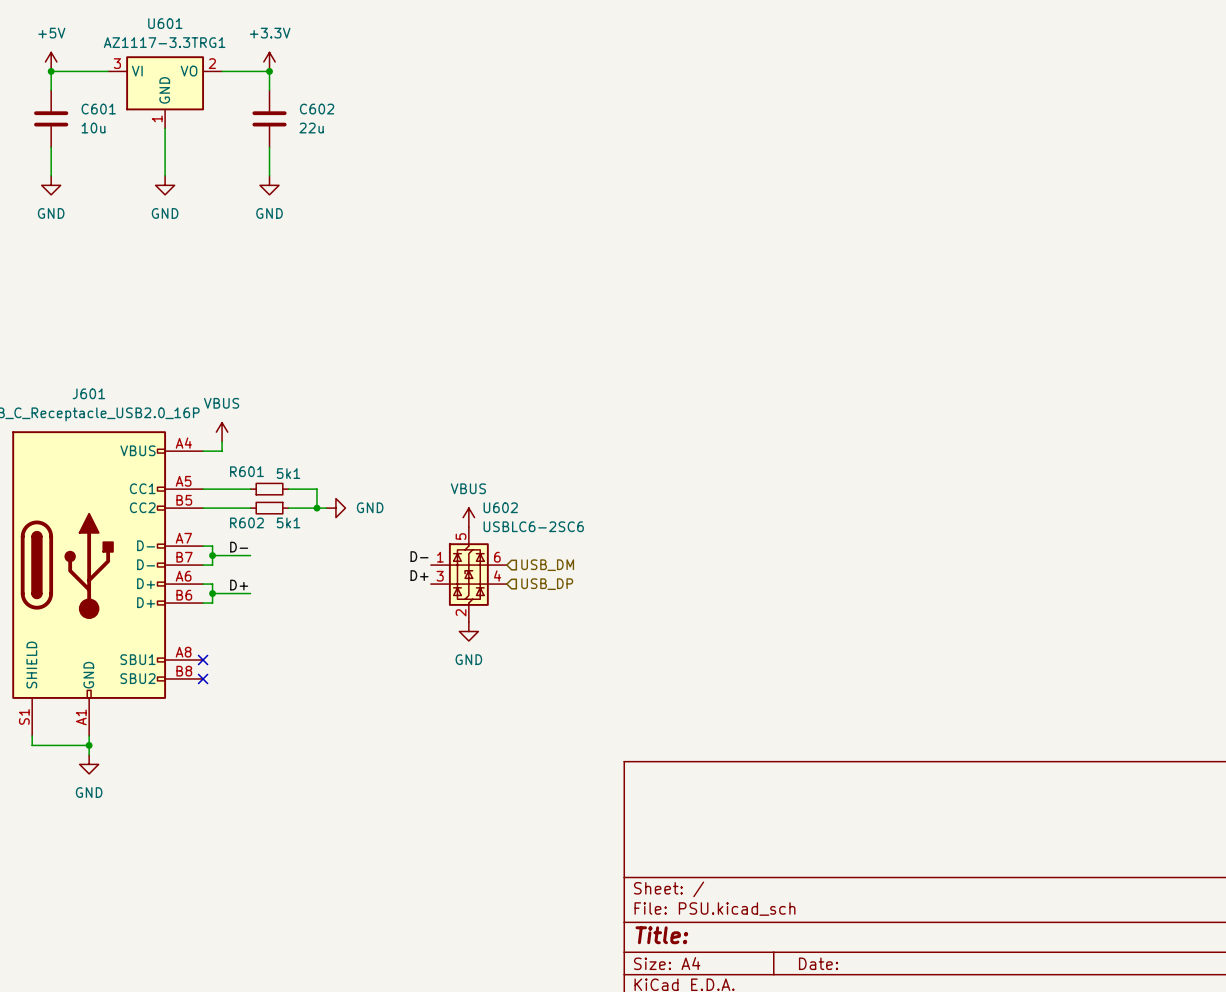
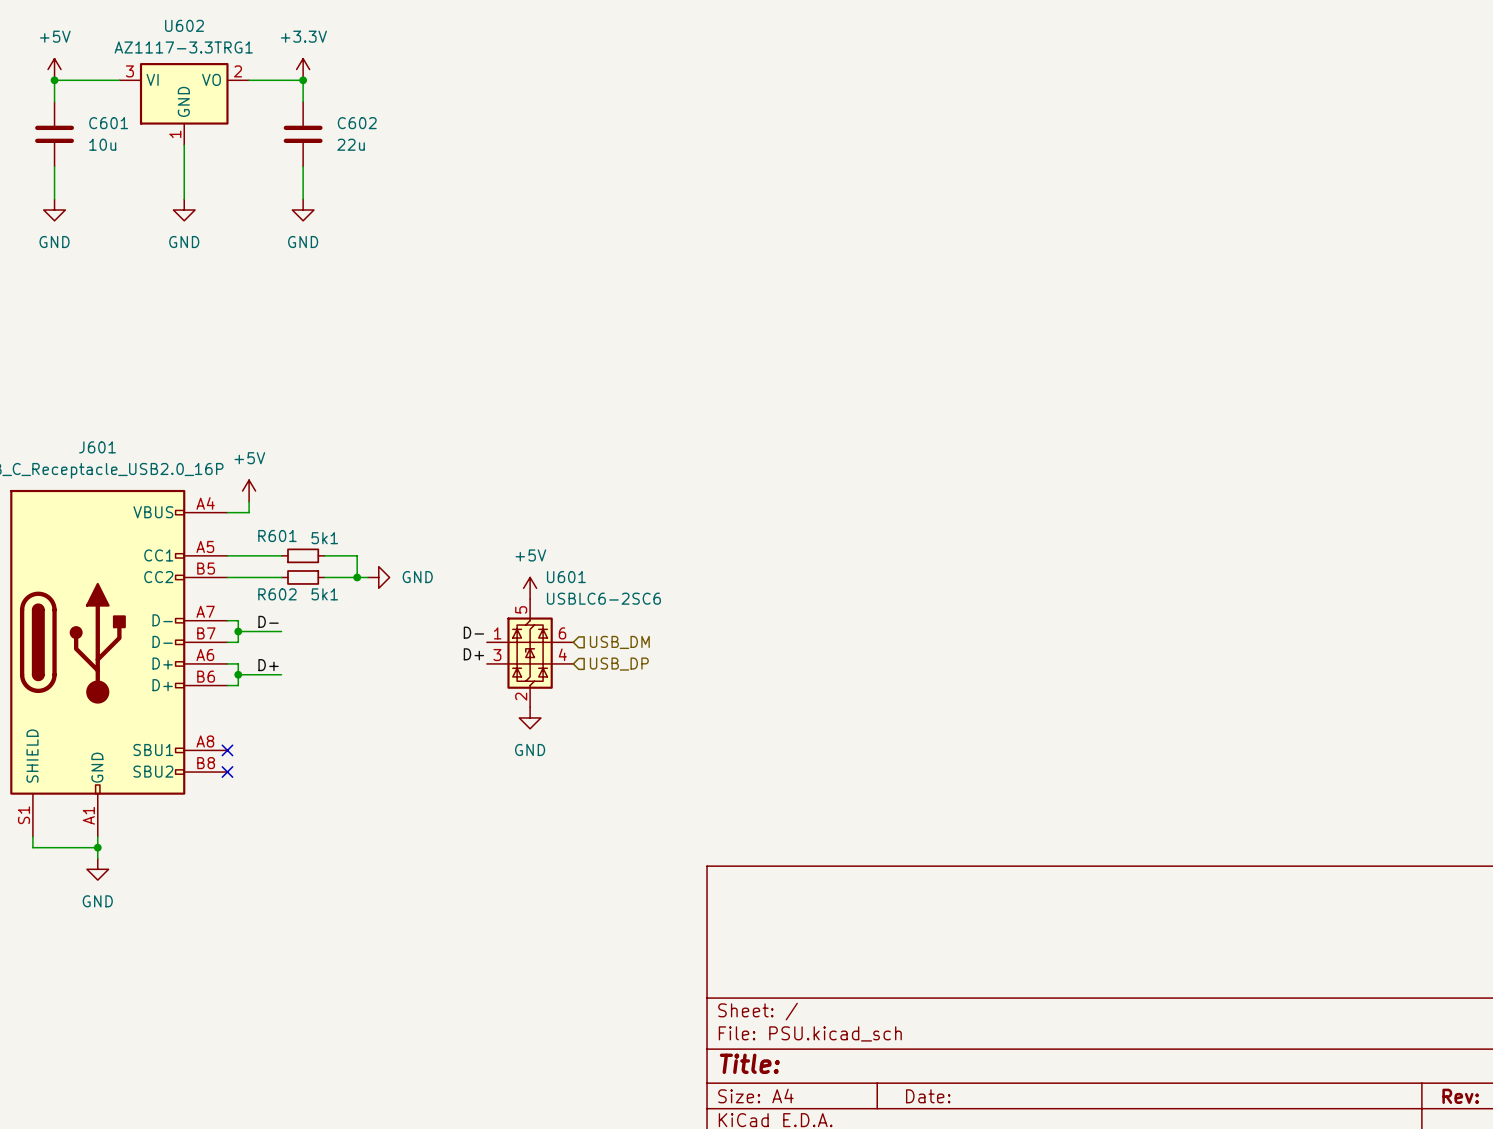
U601 name: U601 (165, 23) -> U602 (184, 25)
power symbol: VBUS (222, 432) -> +5V (249, 491)
U602 name: U602 (500, 507) -> U601 (566, 577)
power symbol: VBUS (468, 517) -> +5V (530, 588)

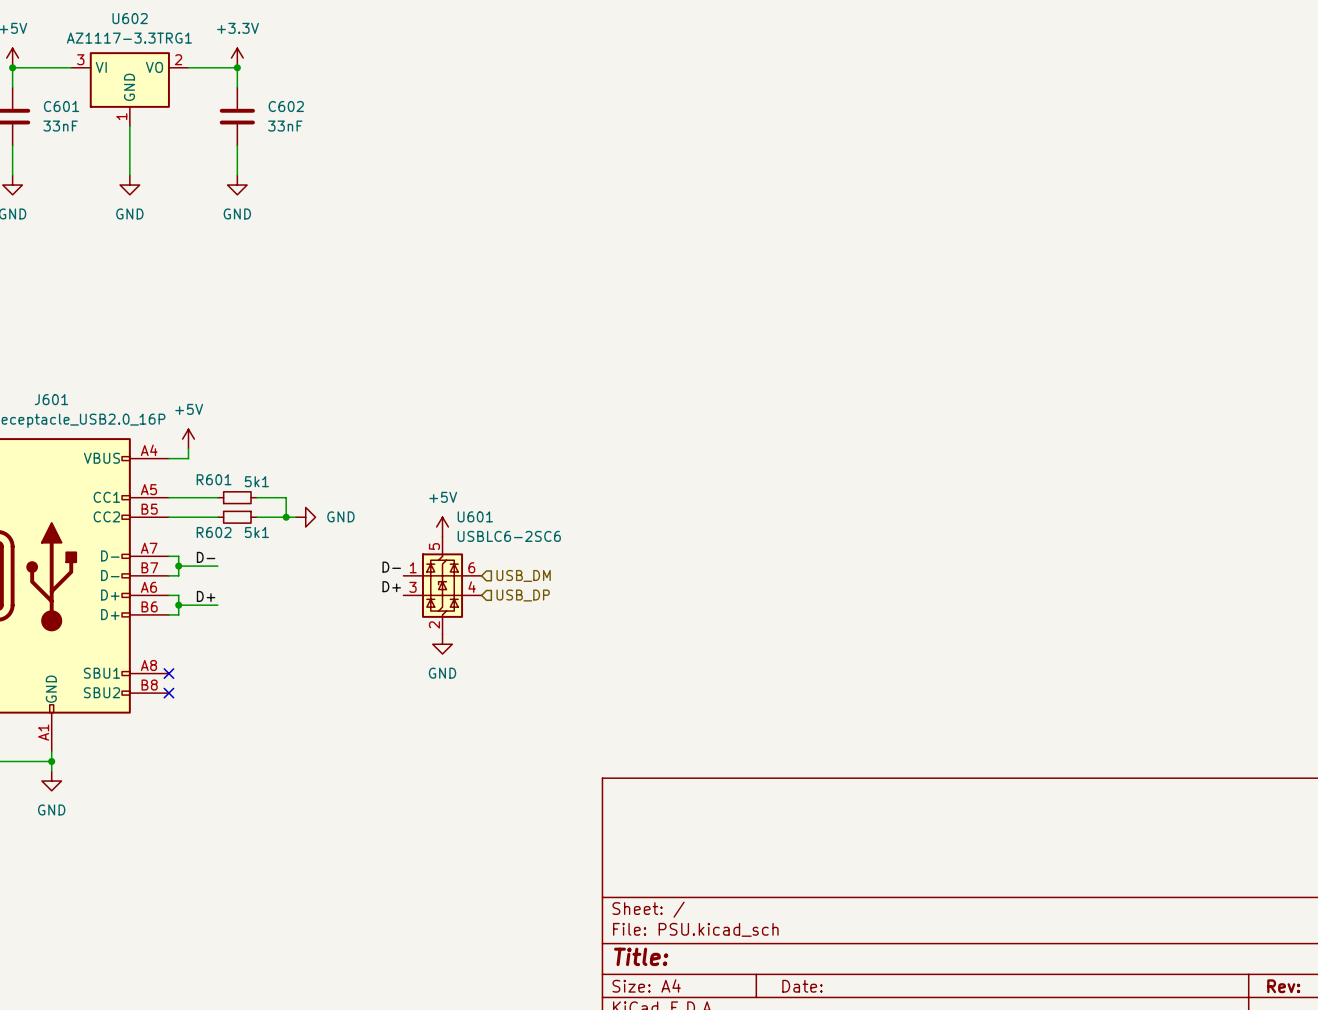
C601 value: 10u (102, 144) -> 33nF (60, 126)
C602 value: 22u (351, 144) -> 33nF (285, 126)

